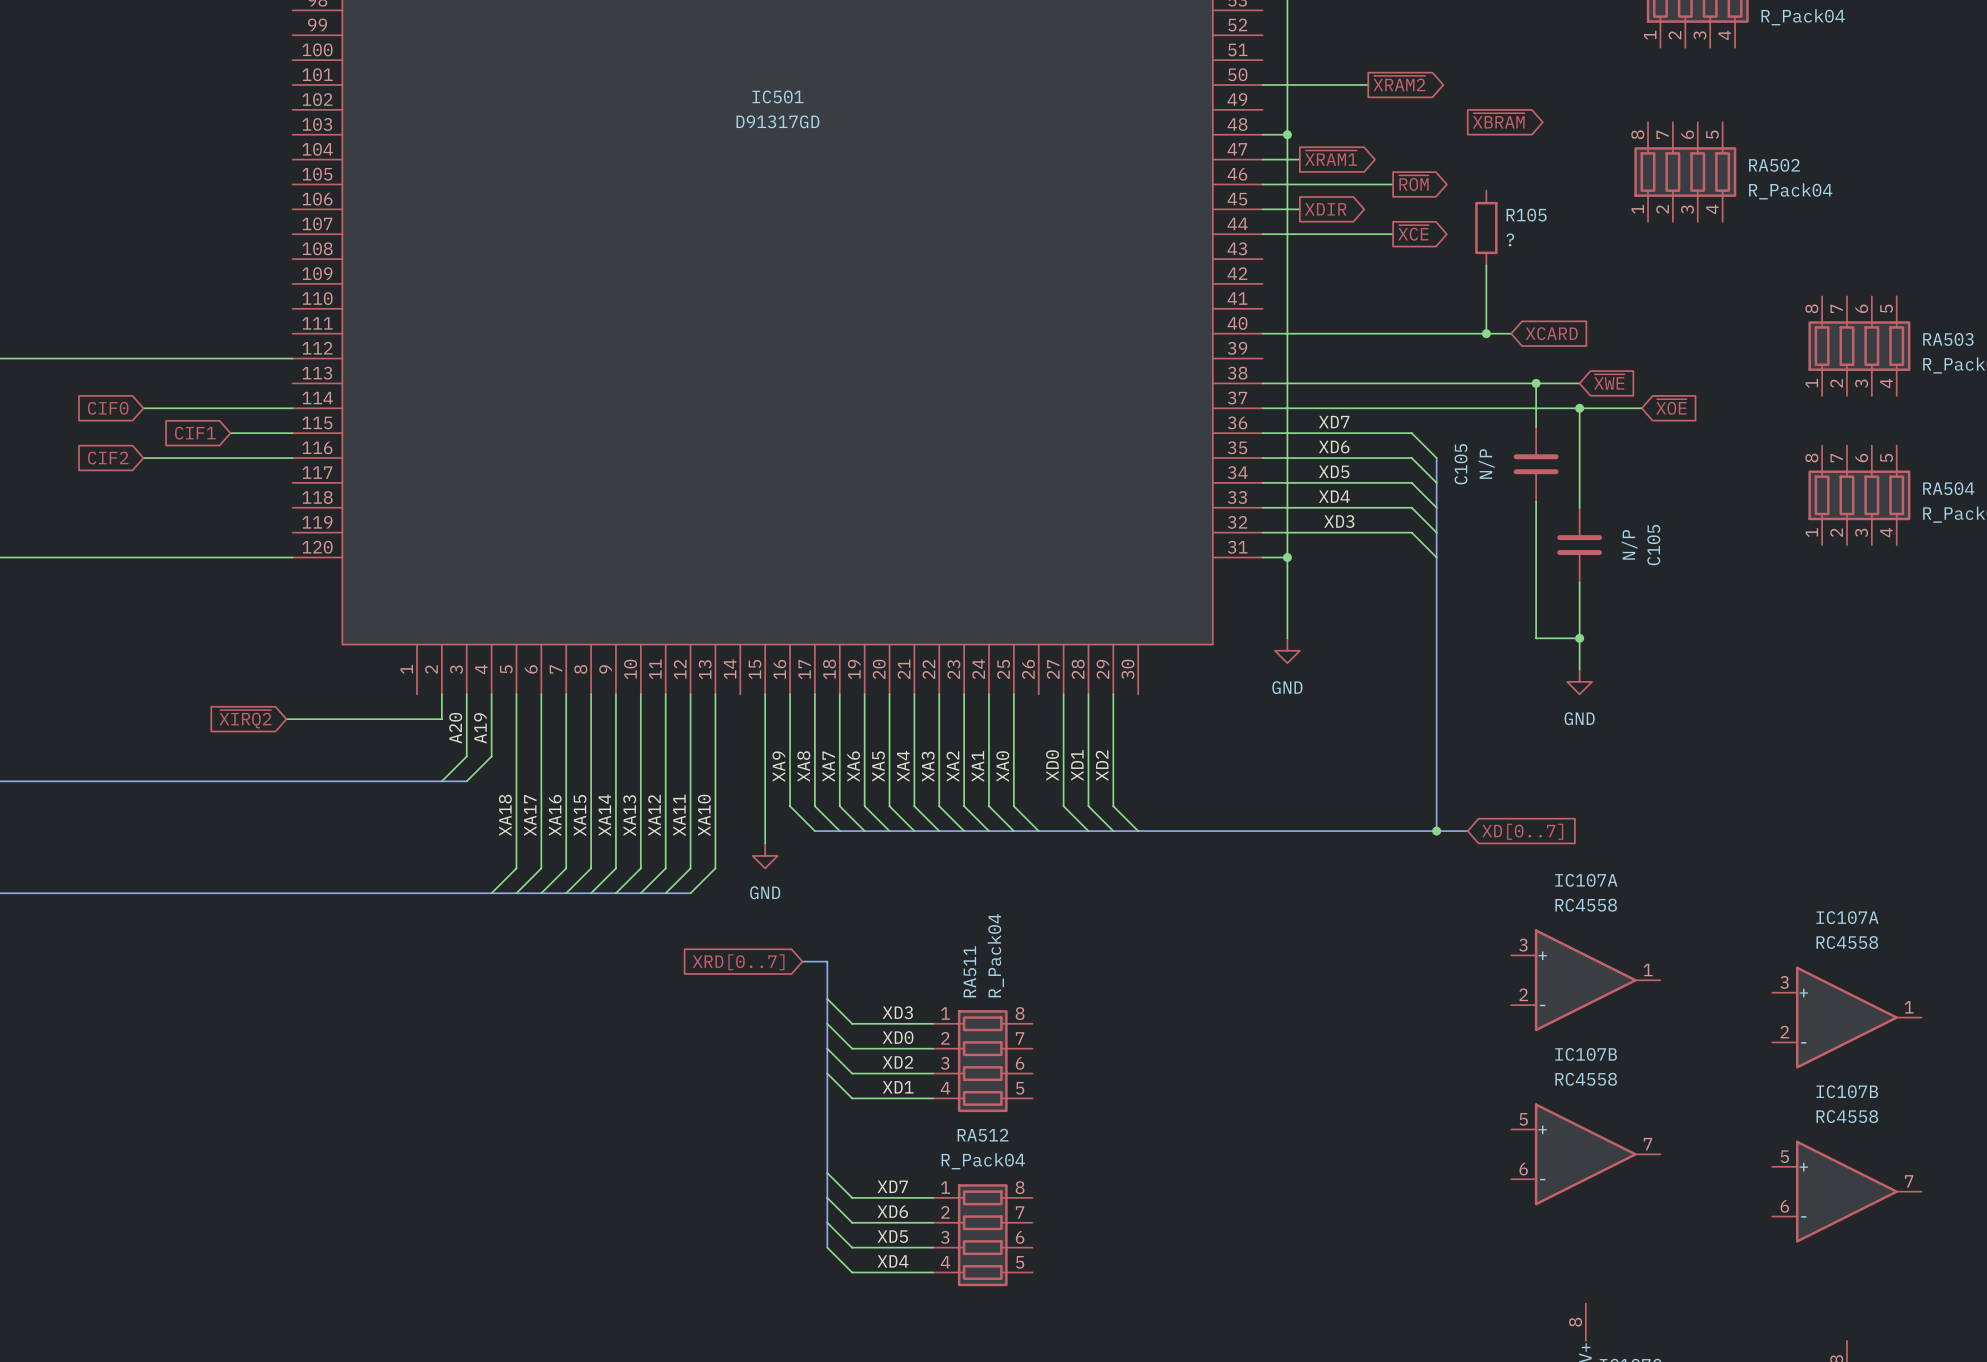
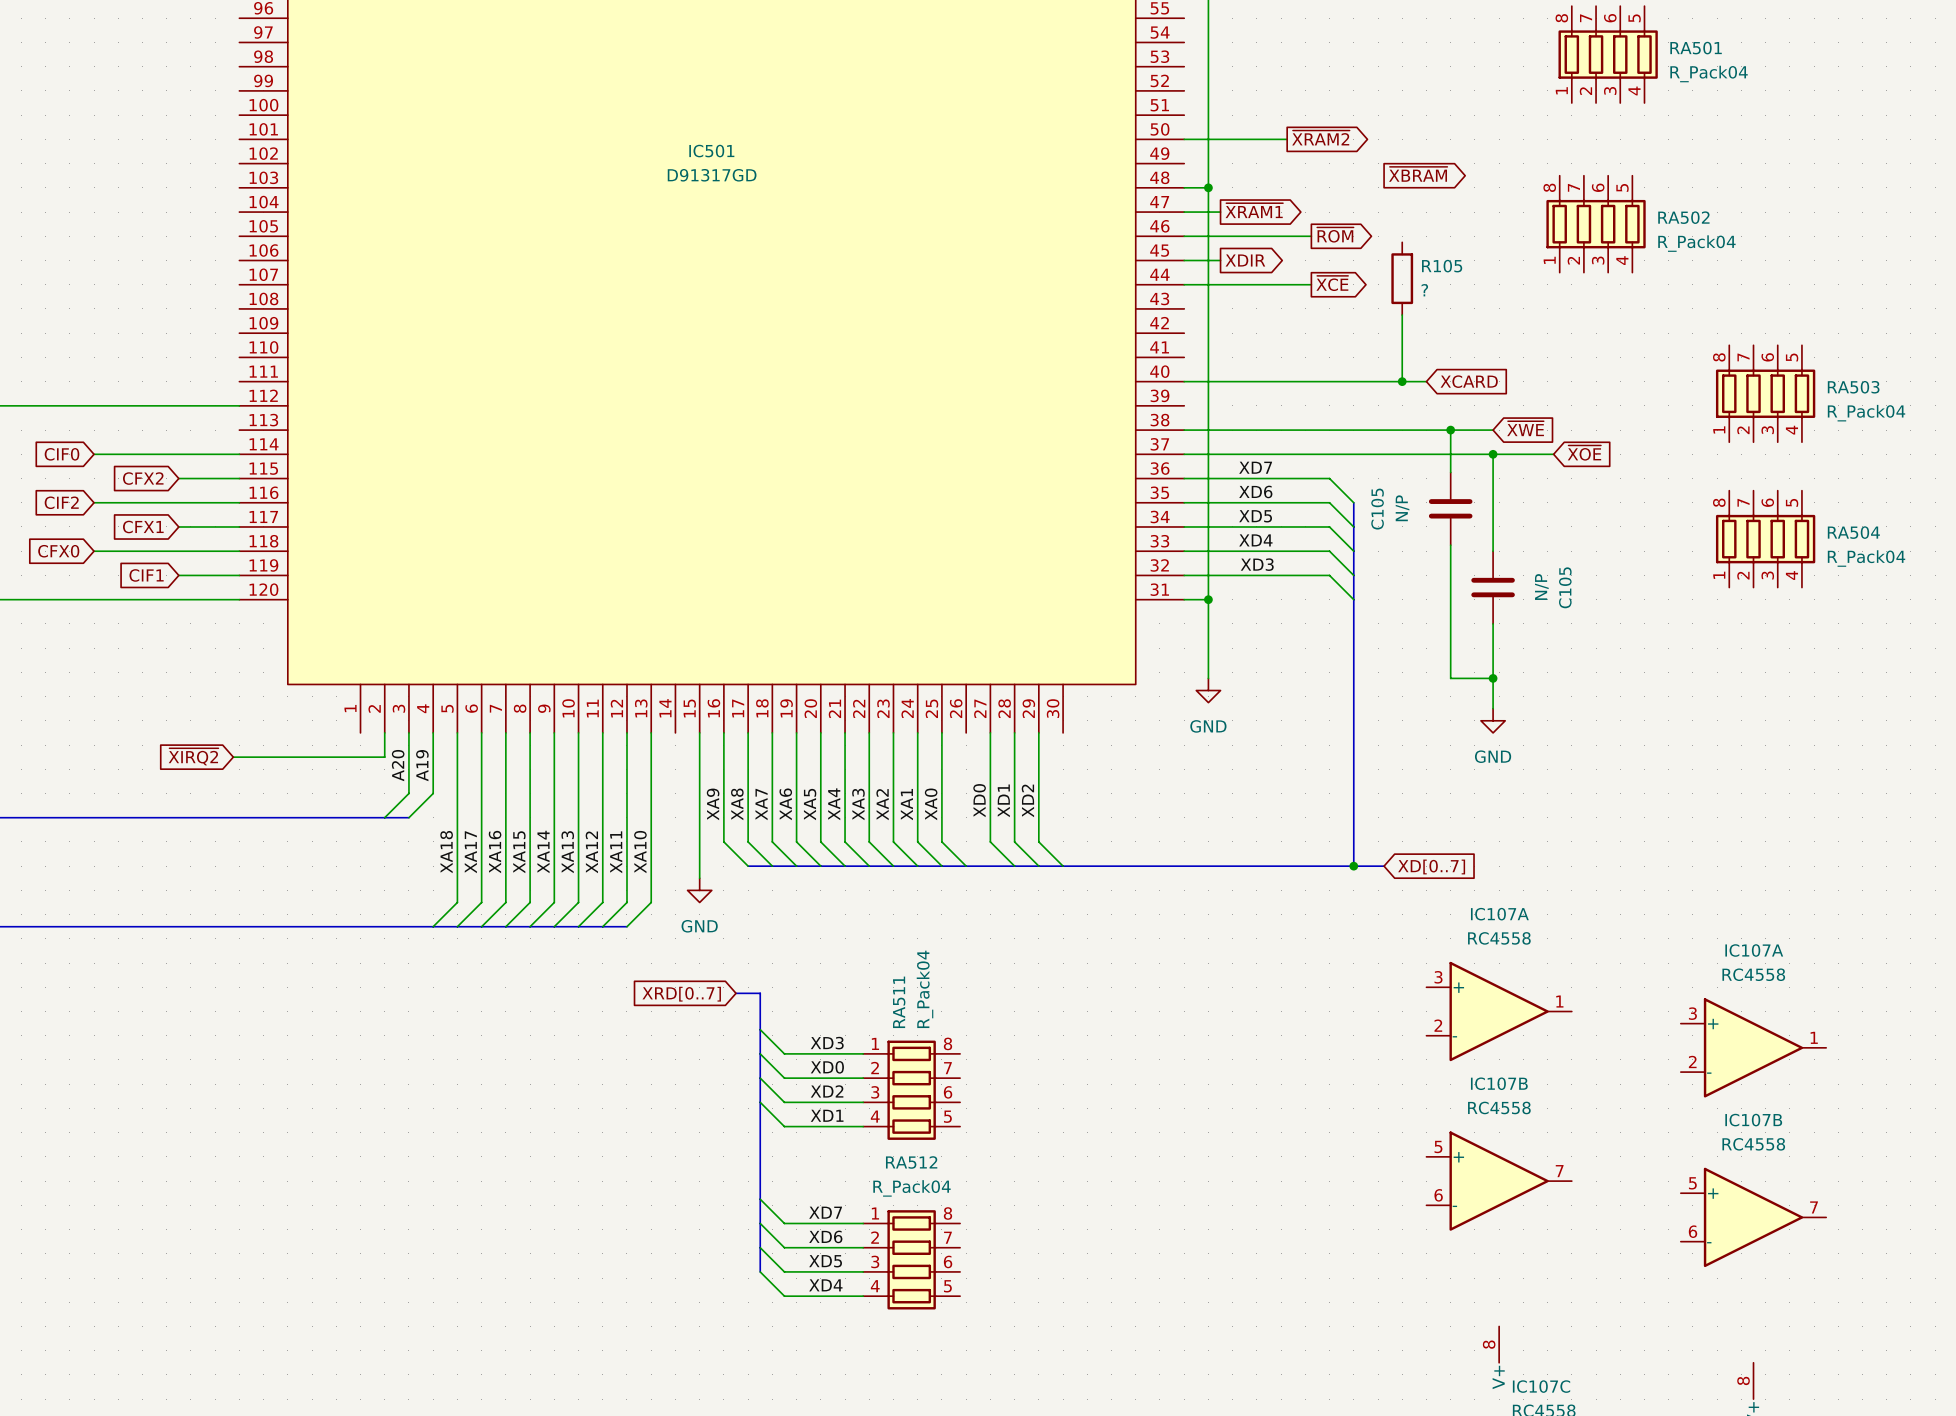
global label: CIF1 (195, 433) -> CFX2 (143, 478)
global label: none -> CFX1 (143, 527)
wire: none -> (178, 526) (239, 526)
global label: none -> CFX0 (58, 551)
wire: none -> (94, 551) (239, 551)
global label: none -> CIF1 (146, 575)
wire: none -> (178, 575) (239, 575)

